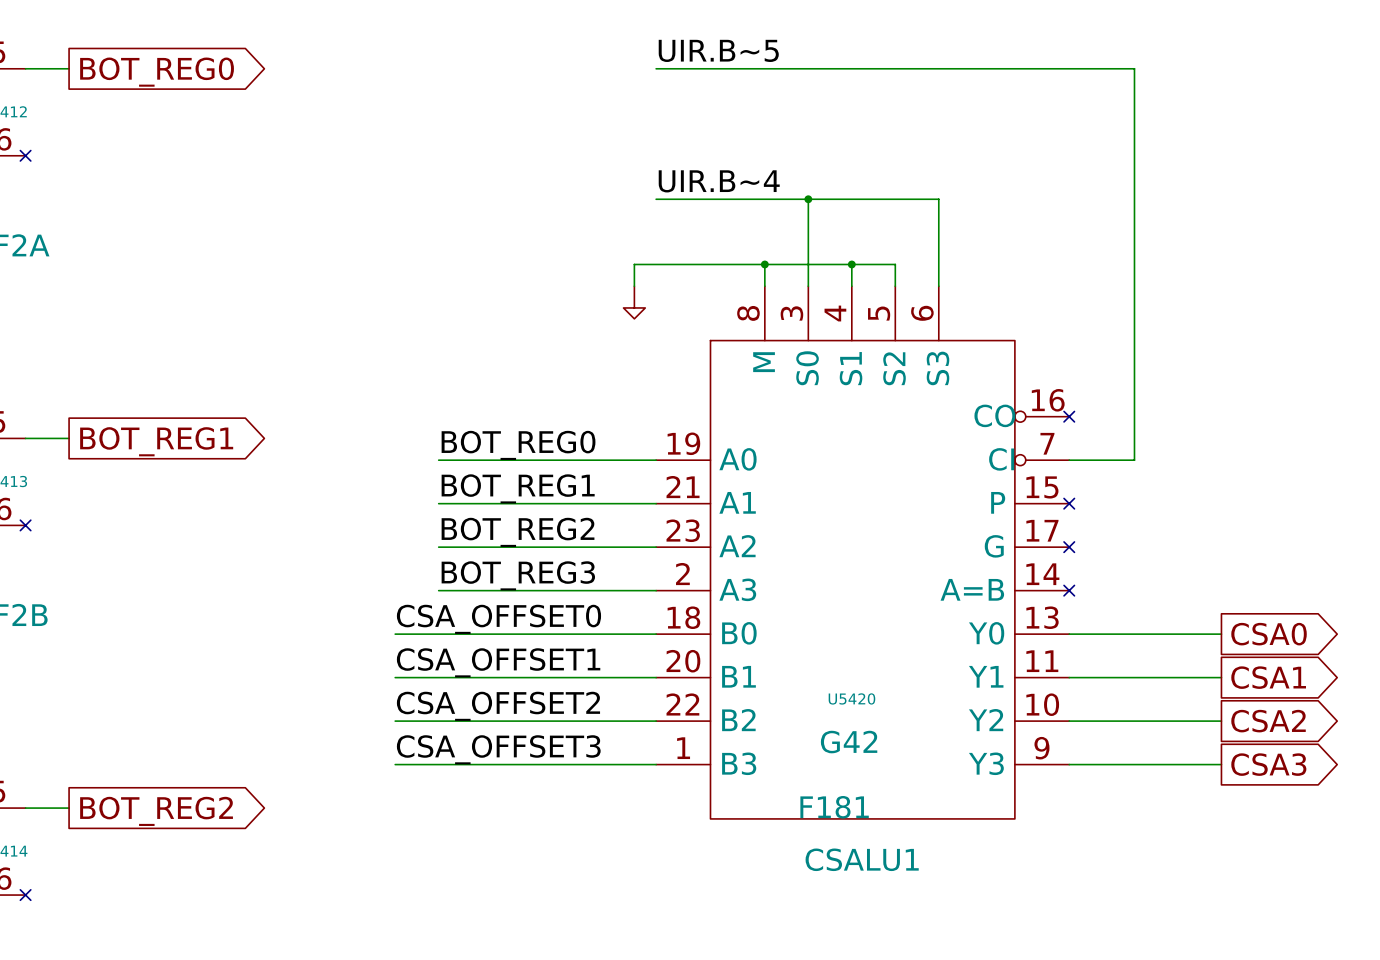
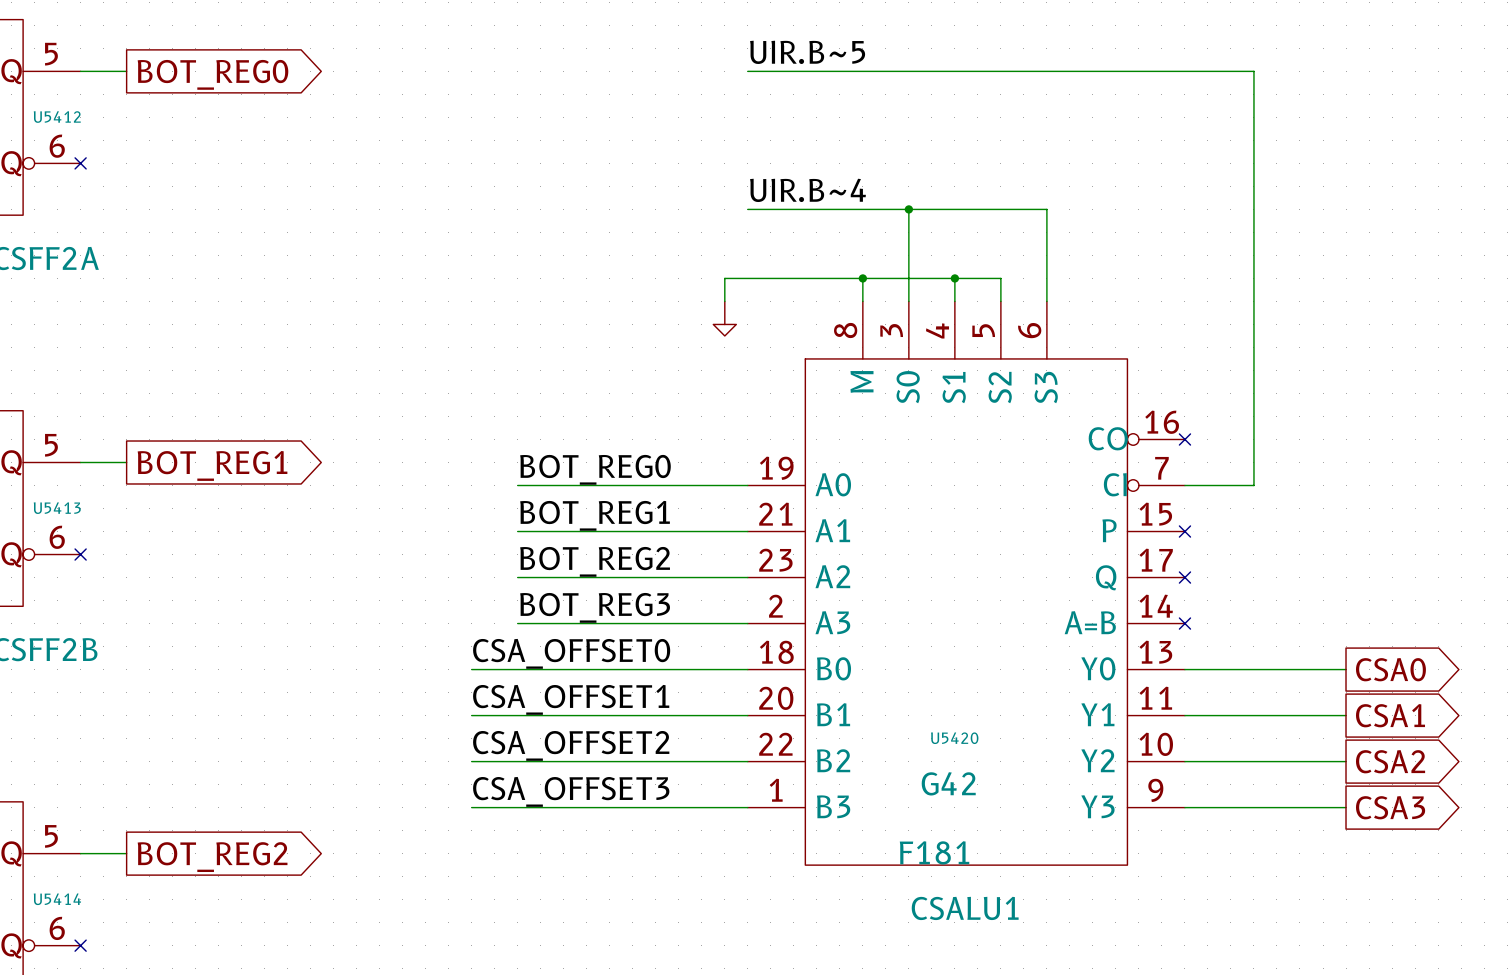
U5420 pin name: G (994, 546) -> Q (1106, 577)

